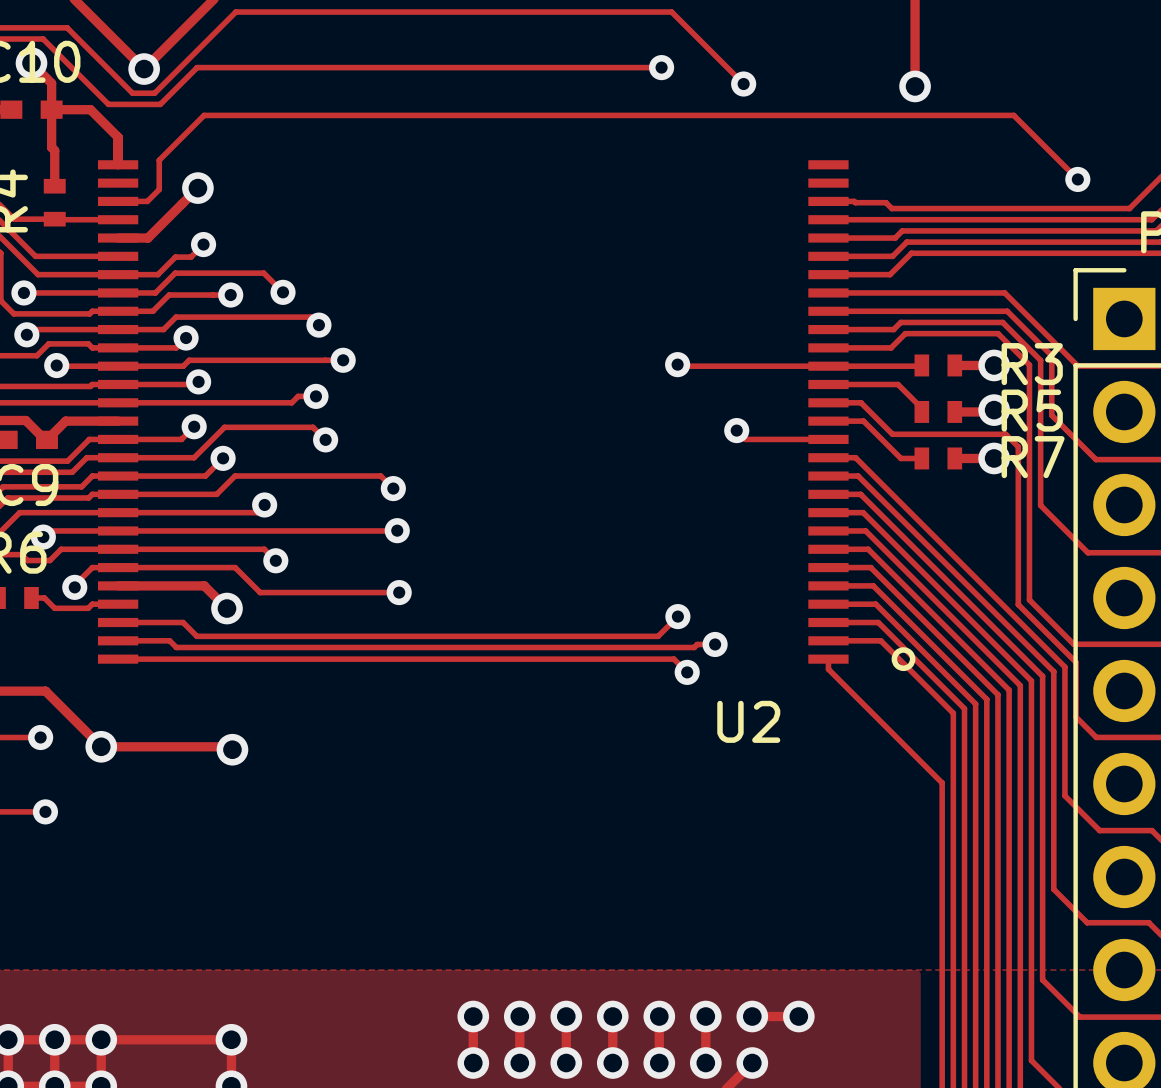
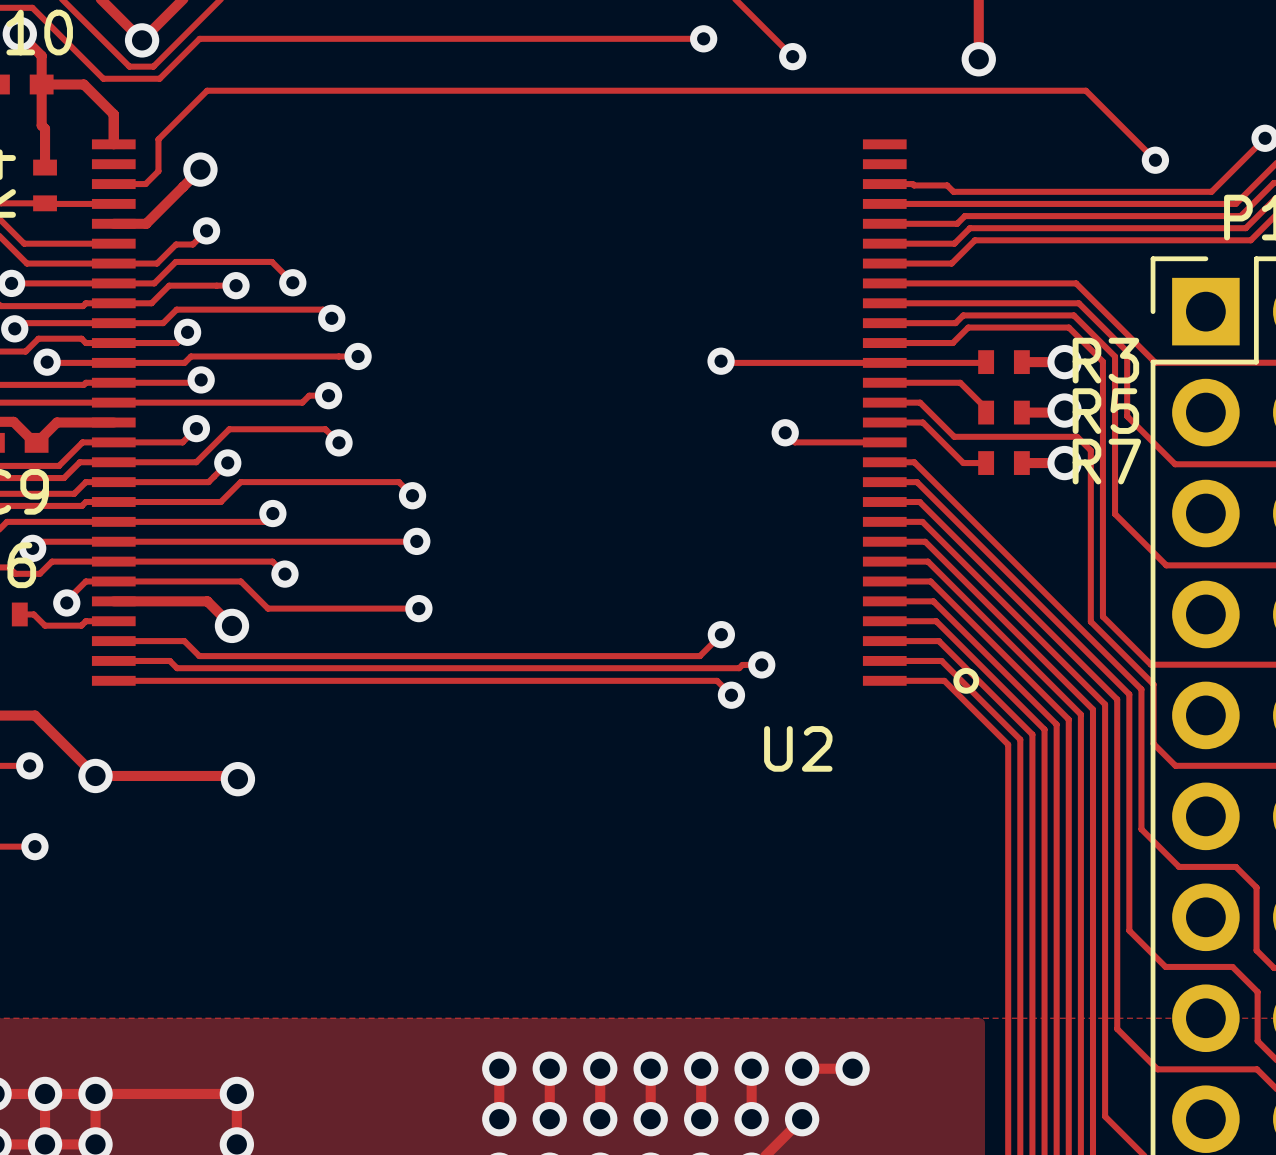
track: (828, 659) (828, 669) (942, 783) -> (884, 680) (944, 680) (1008, 744) (1008, 815)

